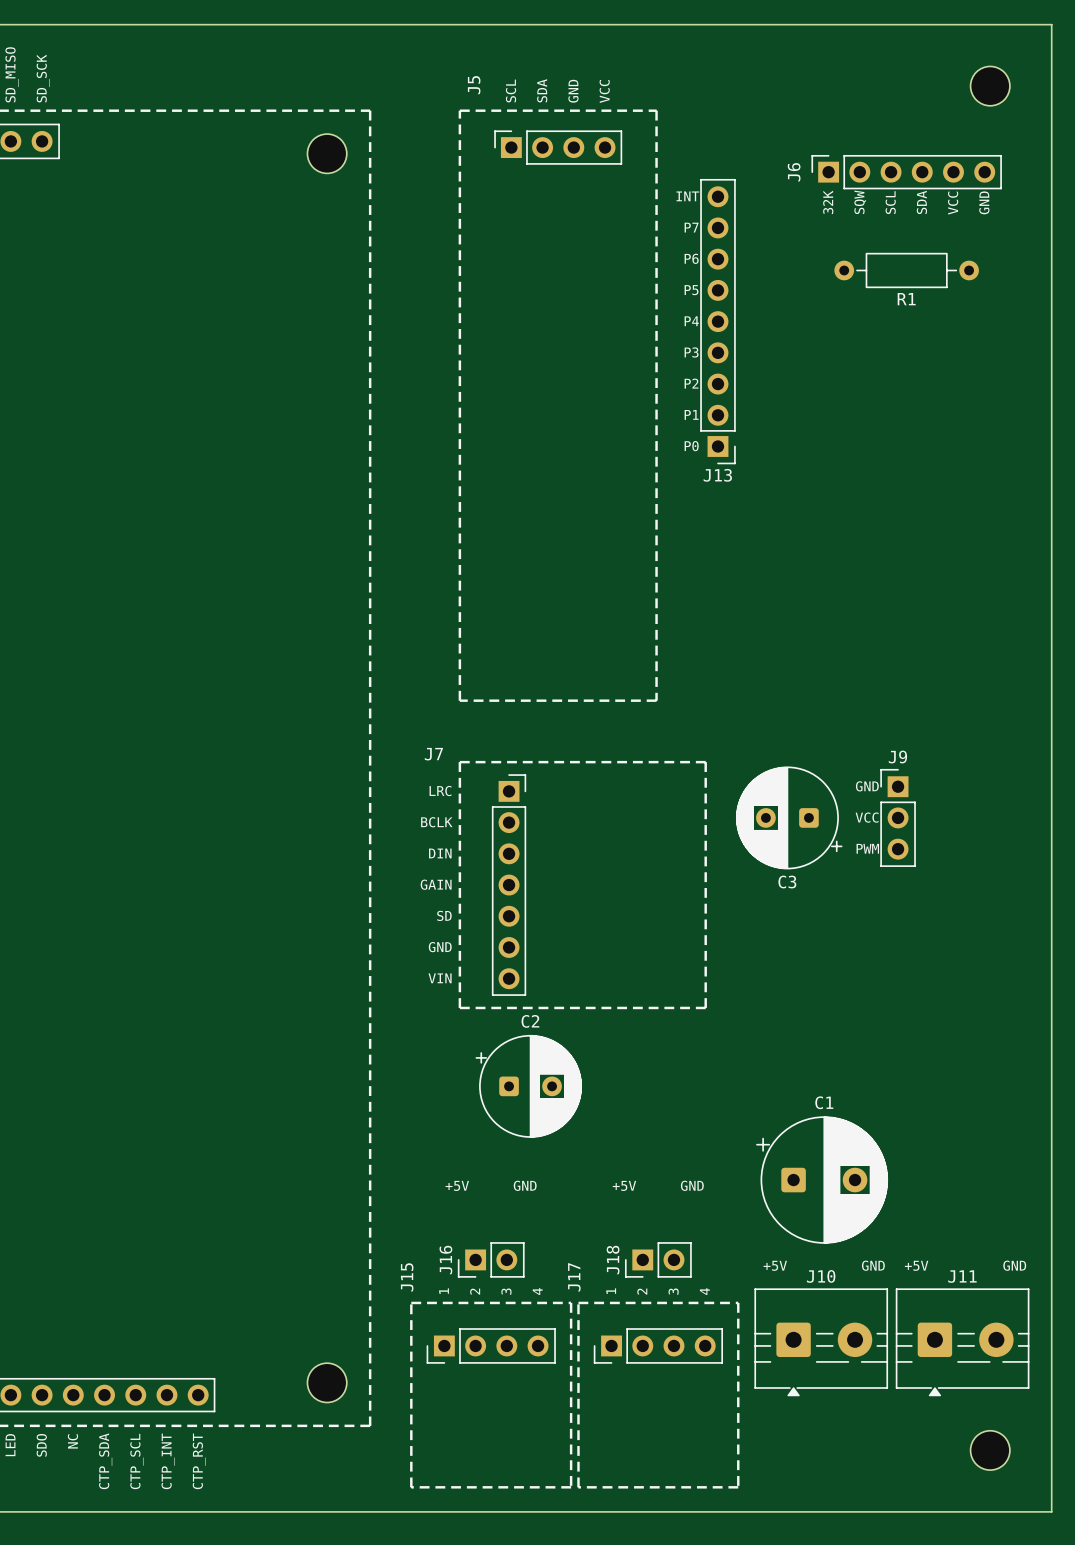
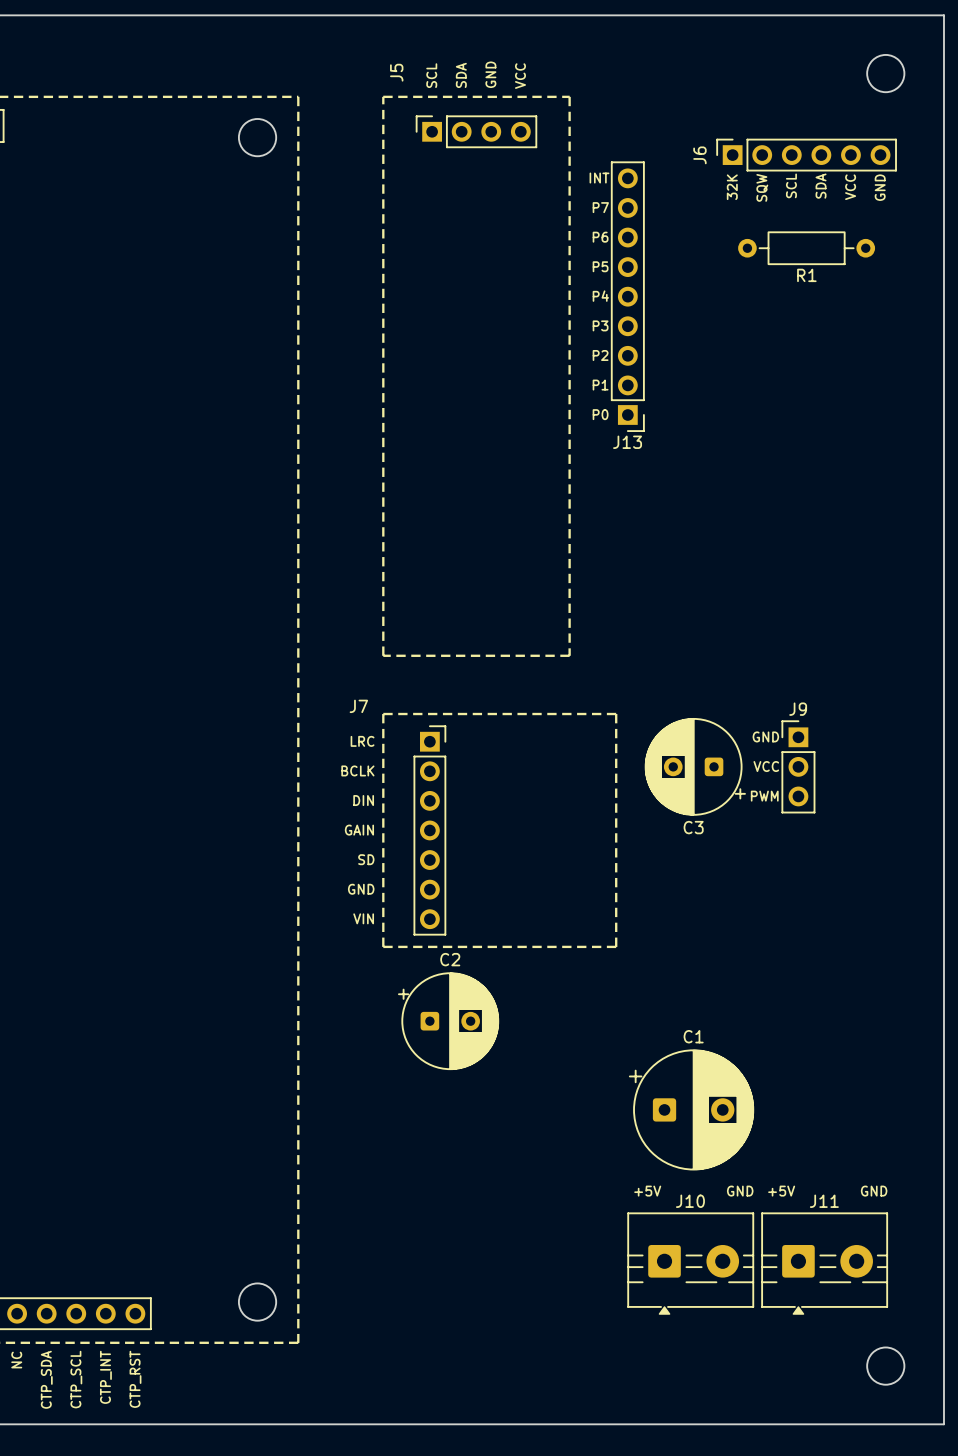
C1 position: (822, 1180) -> (691, 1109)
text: +5V (457, 1185) -> none
text: GND (525, 1185) -> none
text: +5V (624, 1185) -> none
text: GND (692, 1185) -> none
J16: (491, 1259) -> none
J18: (658, 1259) -> none
text position: +5V (775, 1265) -> +5V (647, 1191)
text position: GND (873, 1265) -> GND (740, 1191)
text position: +5V (916, 1265) -> +5V (781, 1191)
text position: GND (1014, 1265) -> GND (874, 1191)
text: 1 (444, 1291) -> none
text: 2 (475, 1291) -> none
text: 3 (506, 1291) -> none
text: 4 (537, 1291) -> none
text: 1 (611, 1291) -> none
text: 2 (642, 1291) -> none
text: 3 (673, 1291) -> none
text: 4 (704, 1291) -> none
line: (411, 1302) (571, 1302) (571, 1487) (411, 1487) (411, 1302) -> none
line: (578, 1302) (738, 1302) (738, 1487) (578, 1487) (578, 1302) -> none
J10 position: (821, 1342) -> (690, 1263)
J11 position: (962, 1342) -> (824, 1263)
J15: (491, 1345) -> none
J17: (658, 1345) -> none

